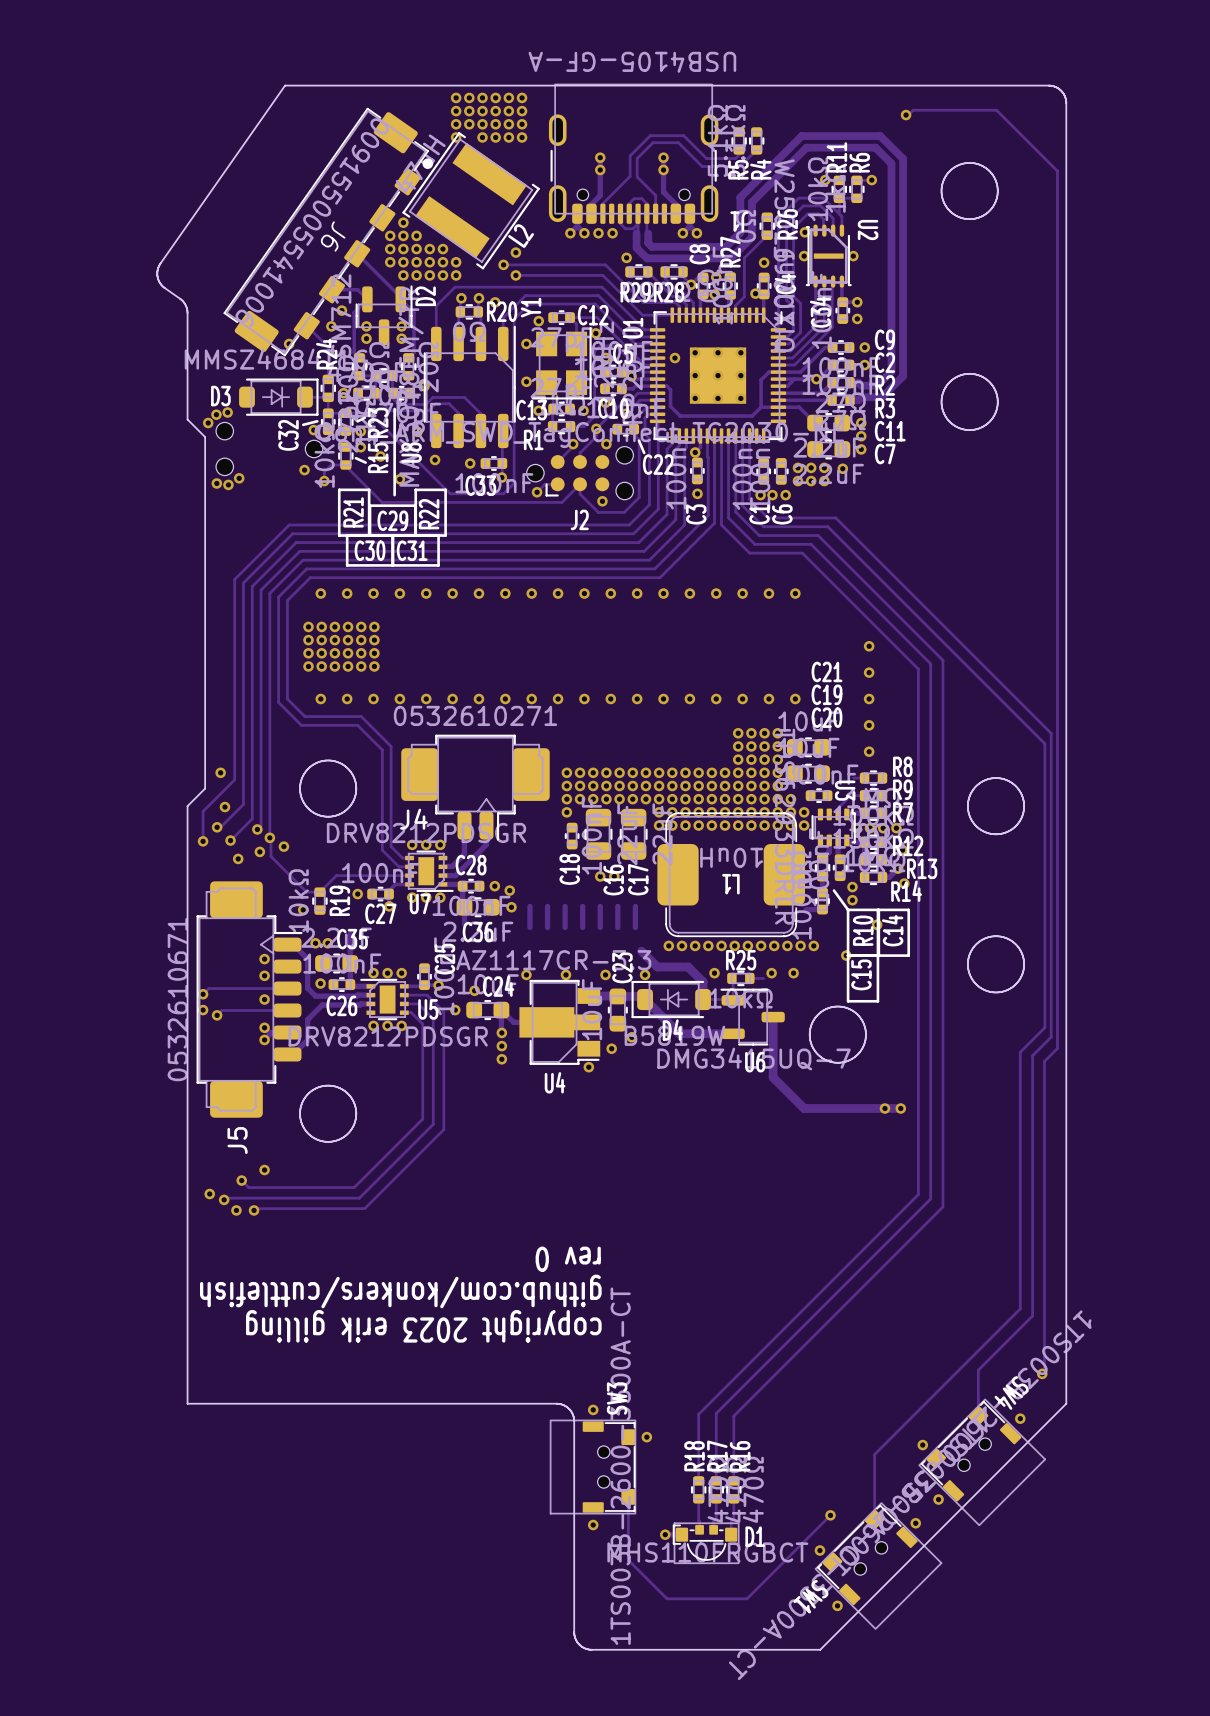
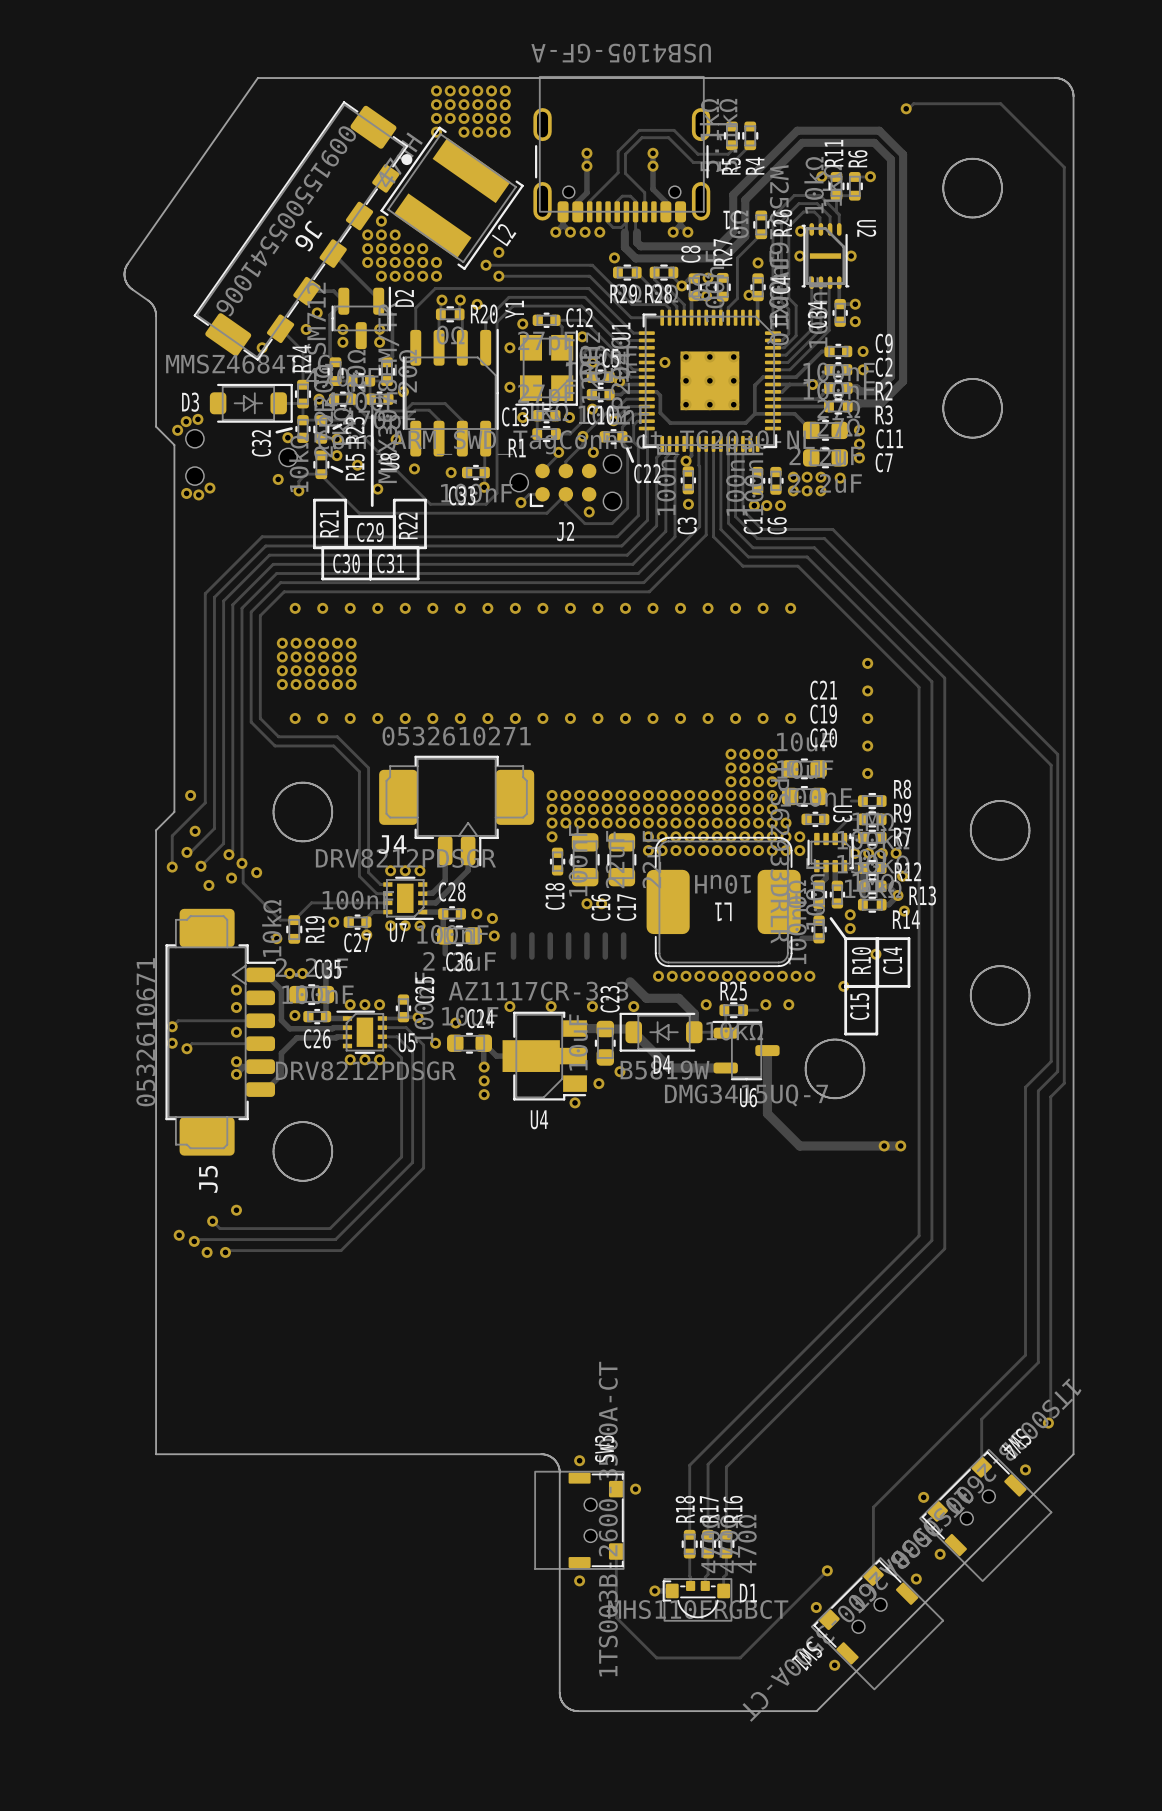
text: rev 0 (568, 1259) -> none
text: github.com/konkers/cuttlefish (400, 1291) -> none
text: copyright 2023 erik gilling (423, 1326) -> none

